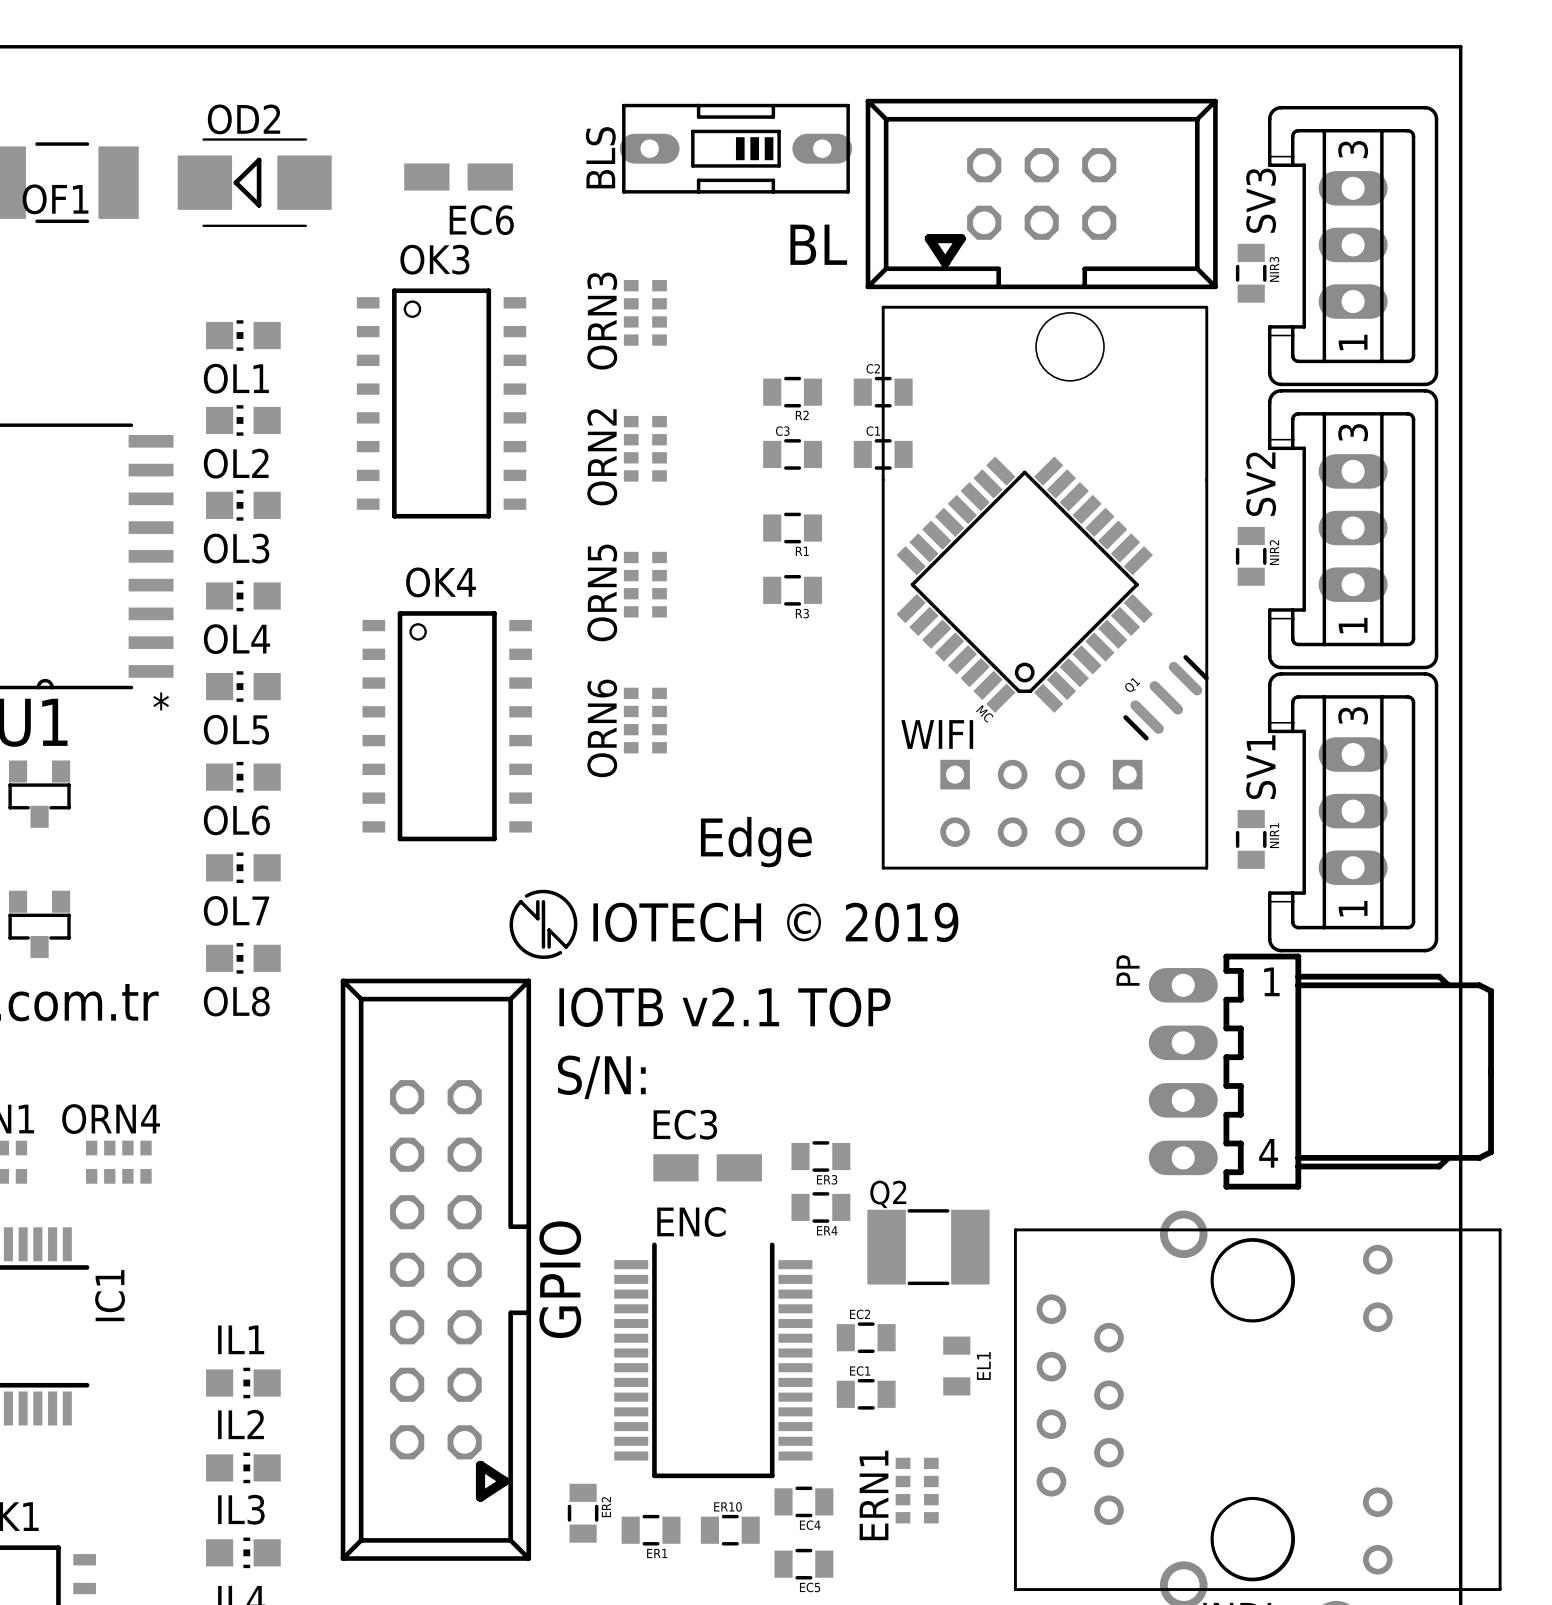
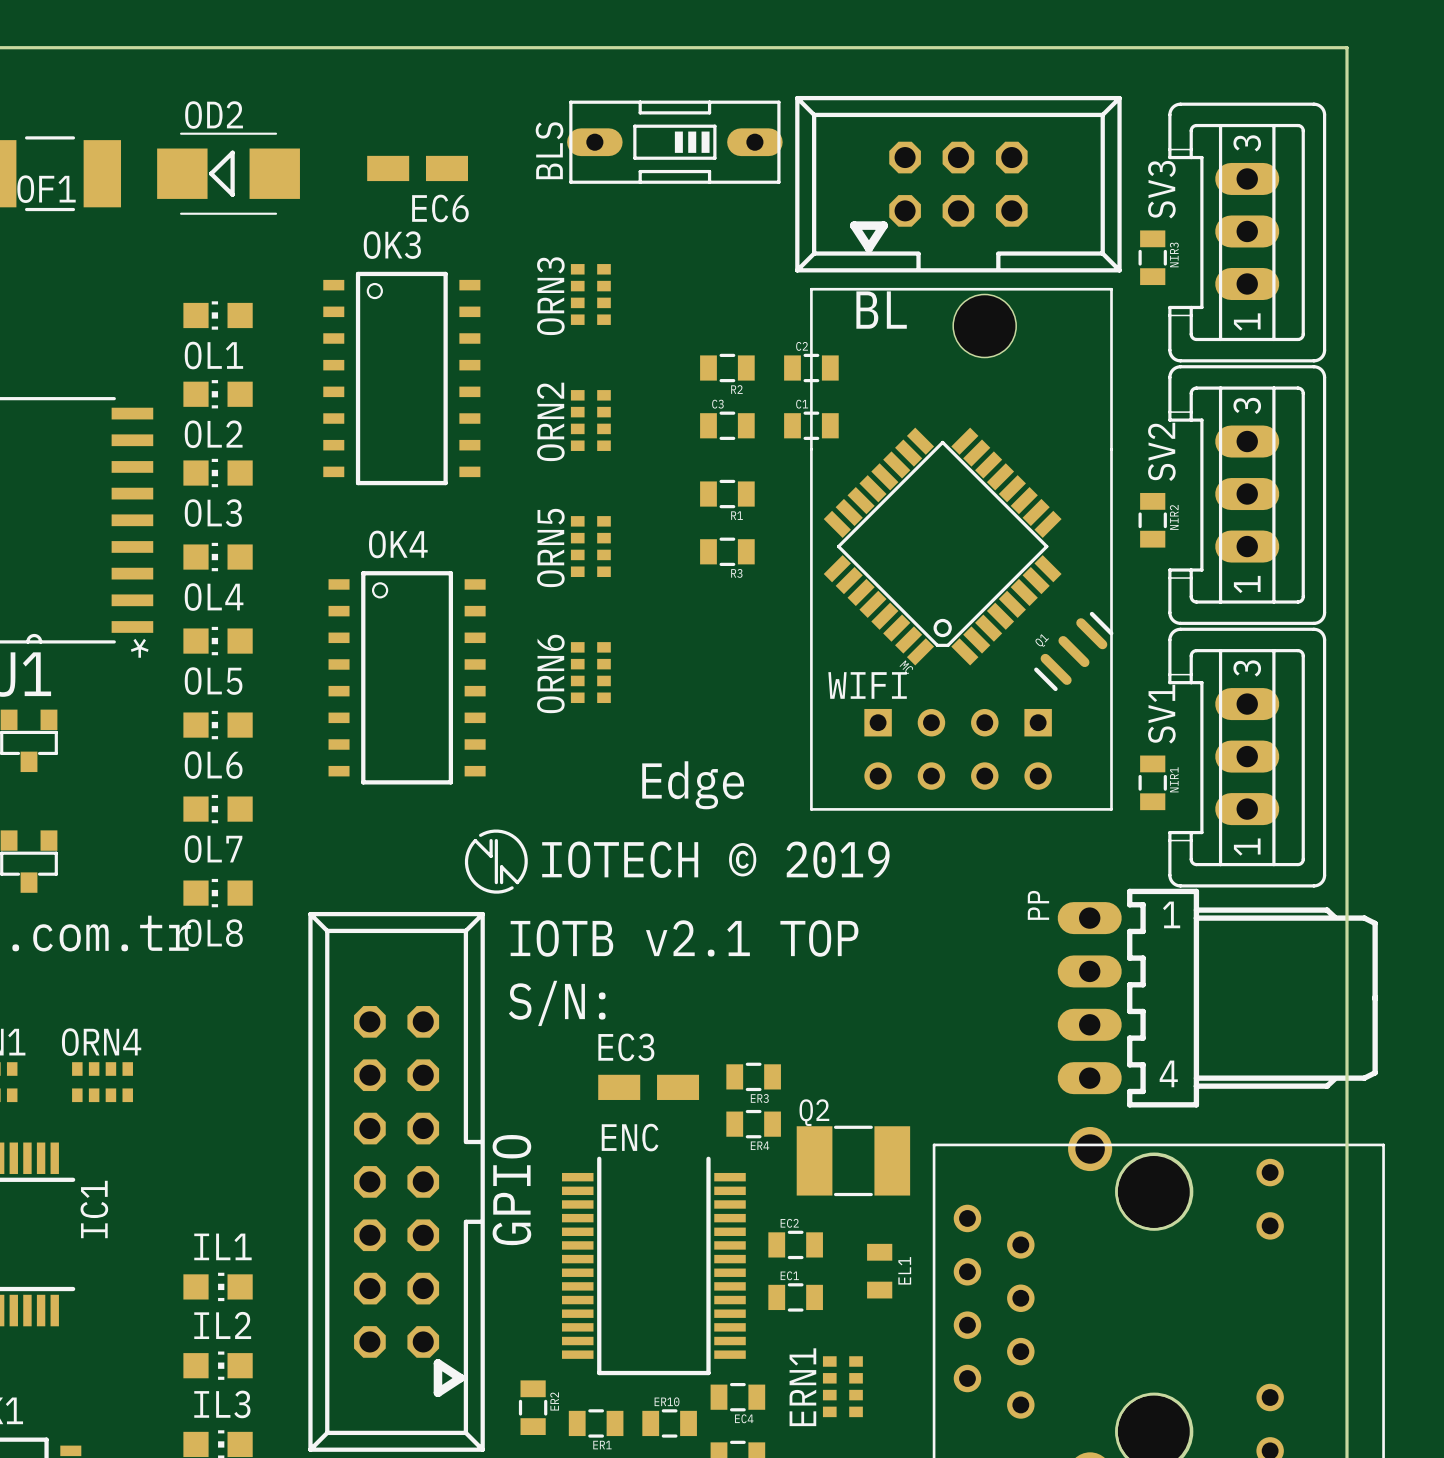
BL name position: BL (818, 244) -> BL (881, 310)

